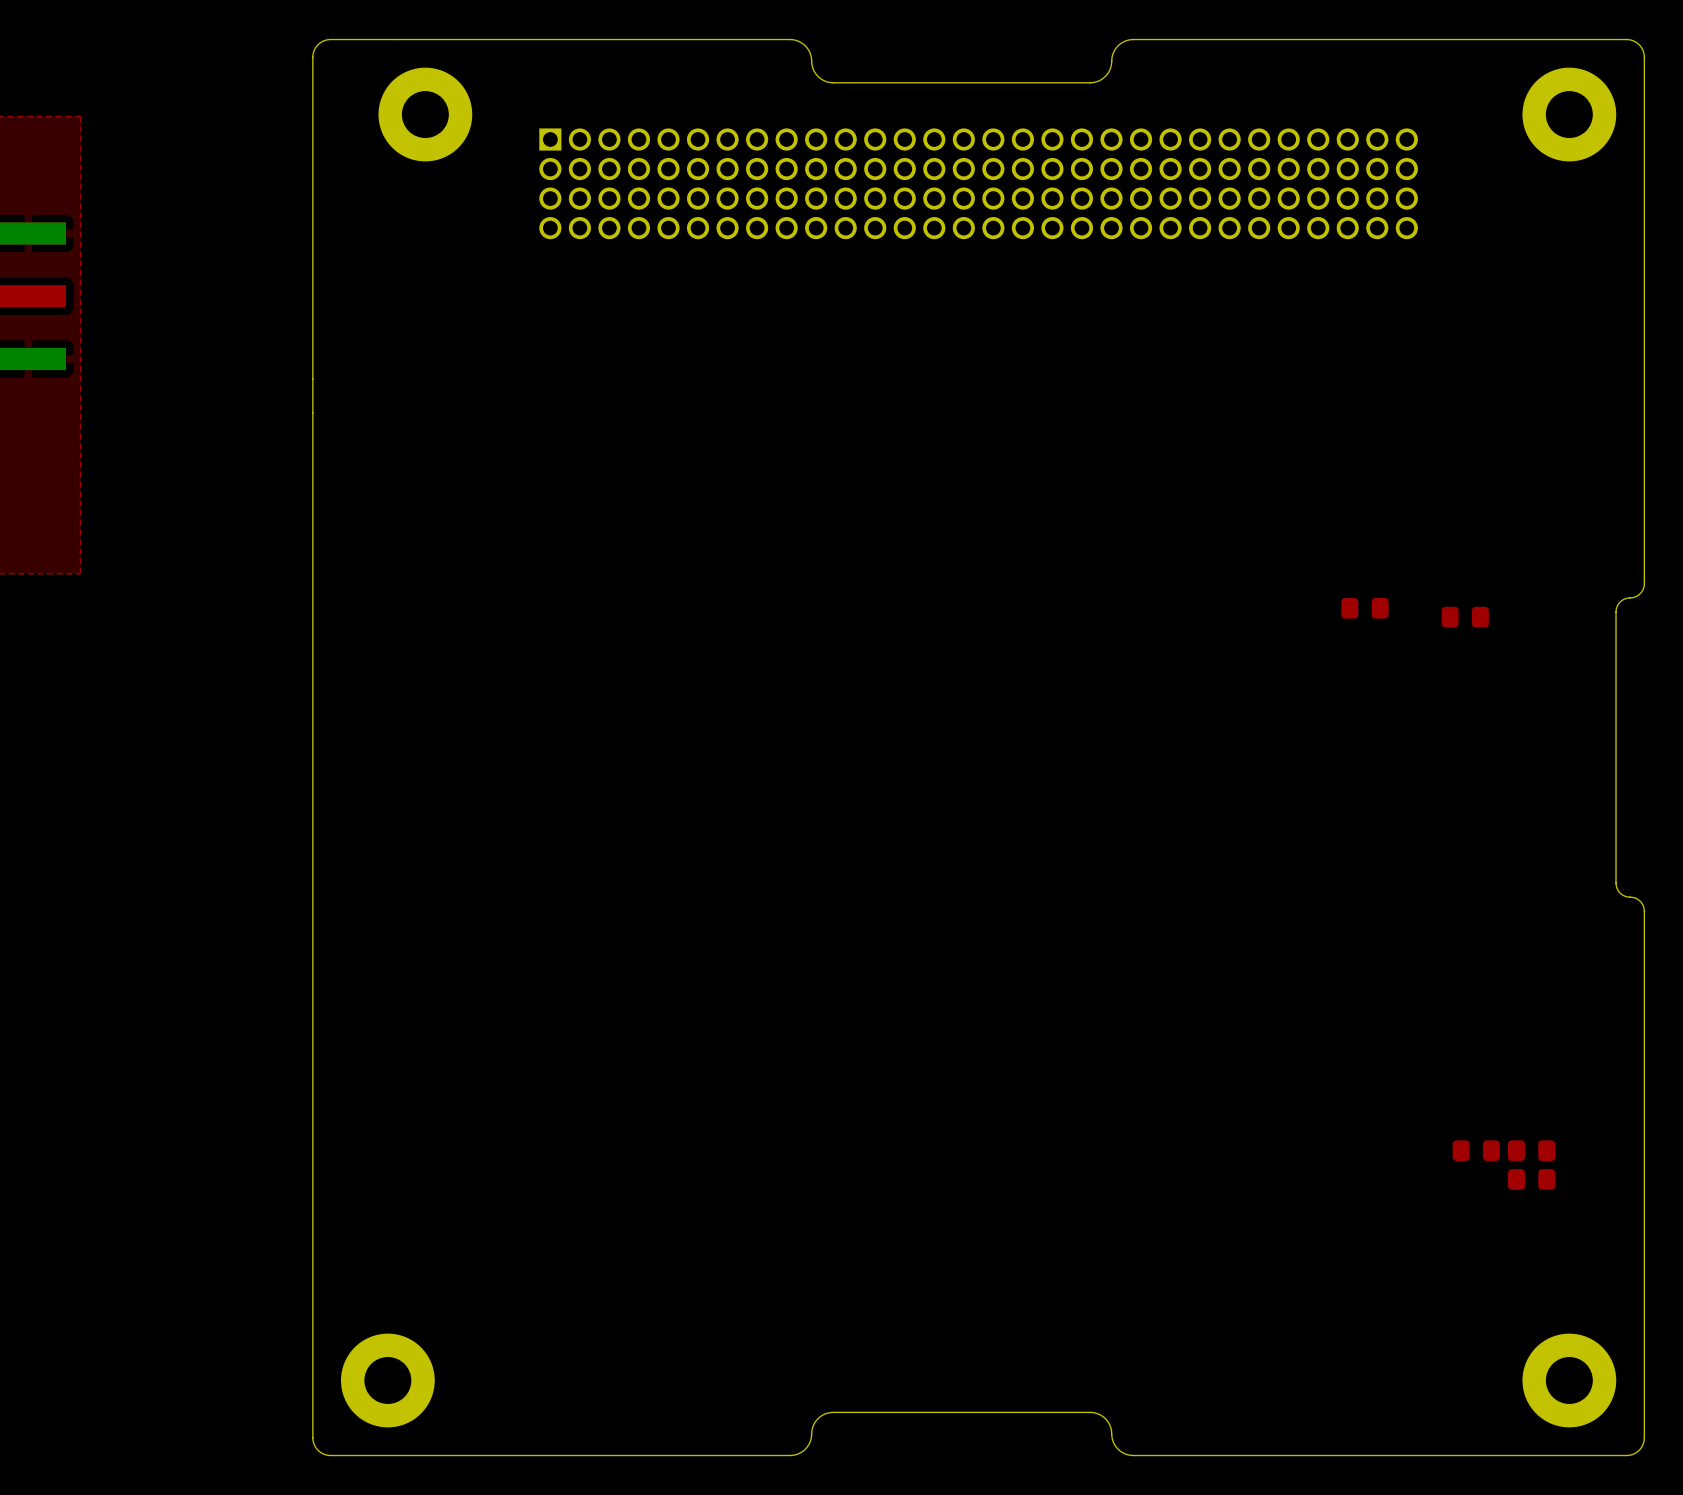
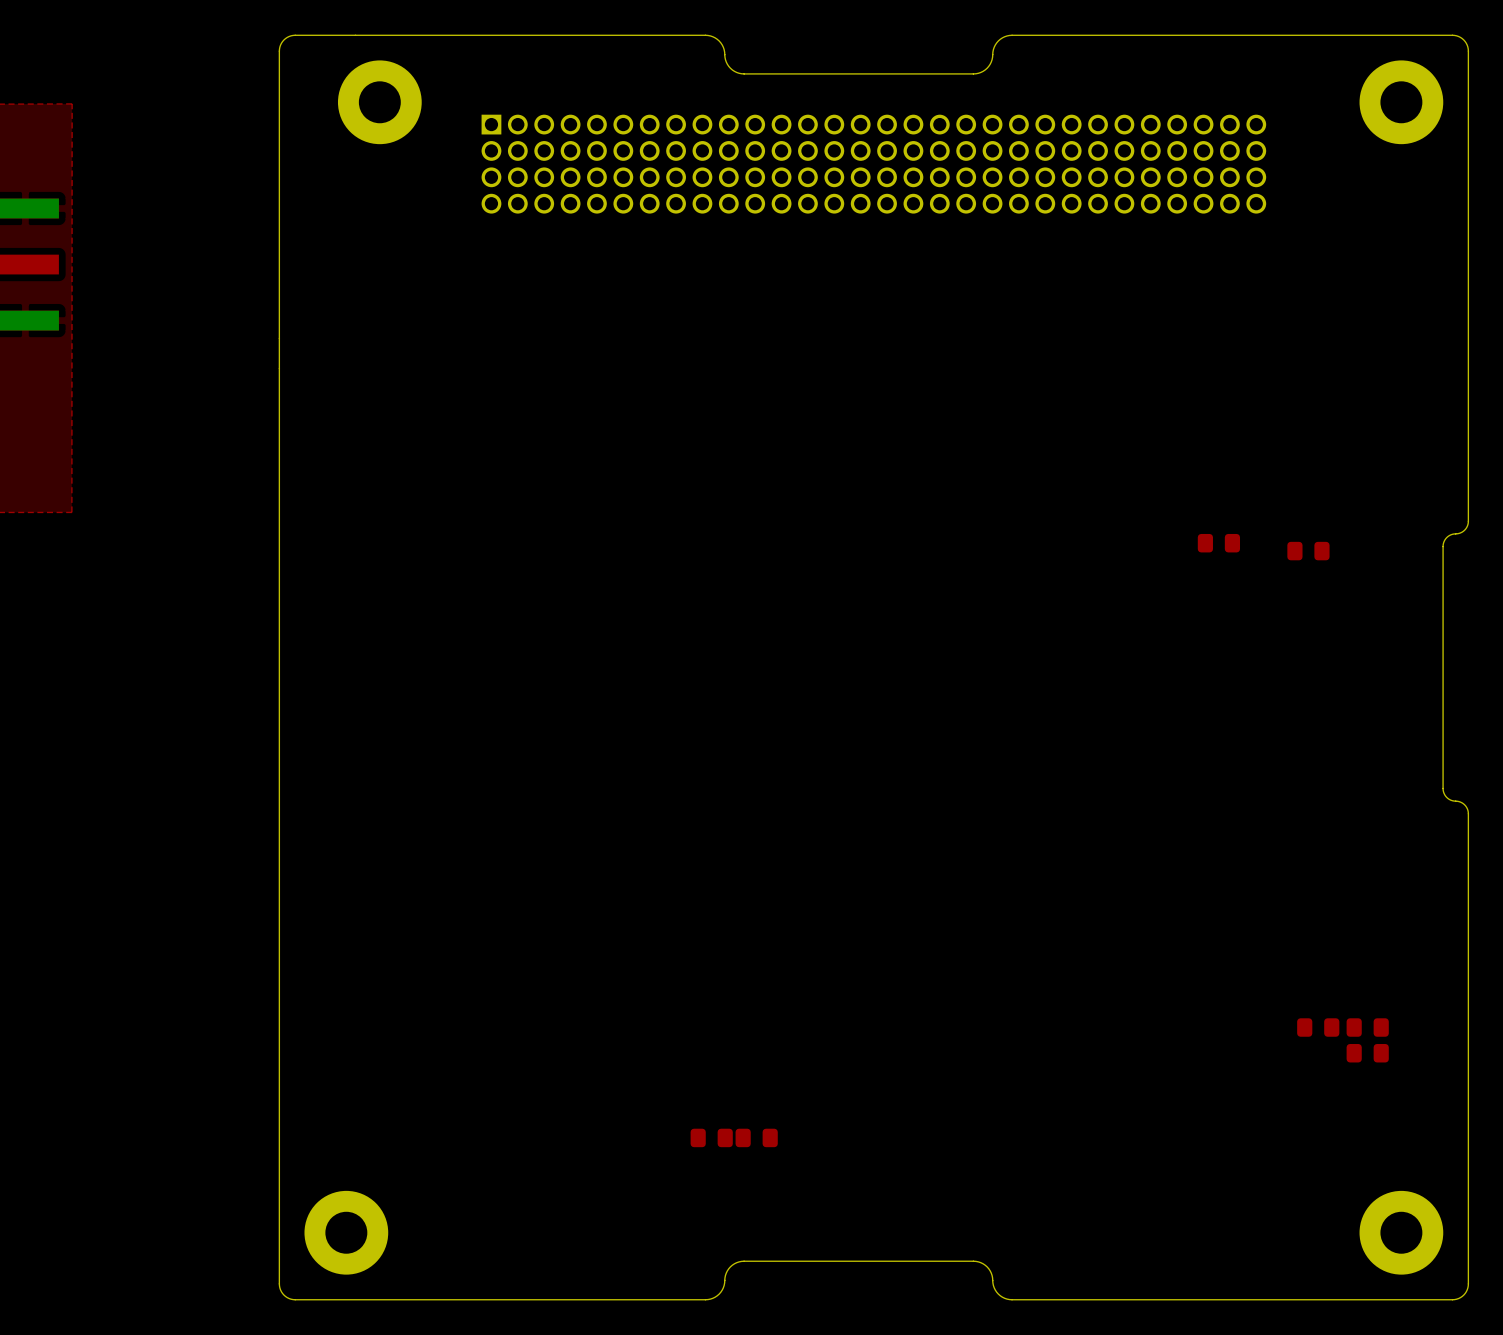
part: none -> (711, 1137)
part: none -> (756, 1137)

